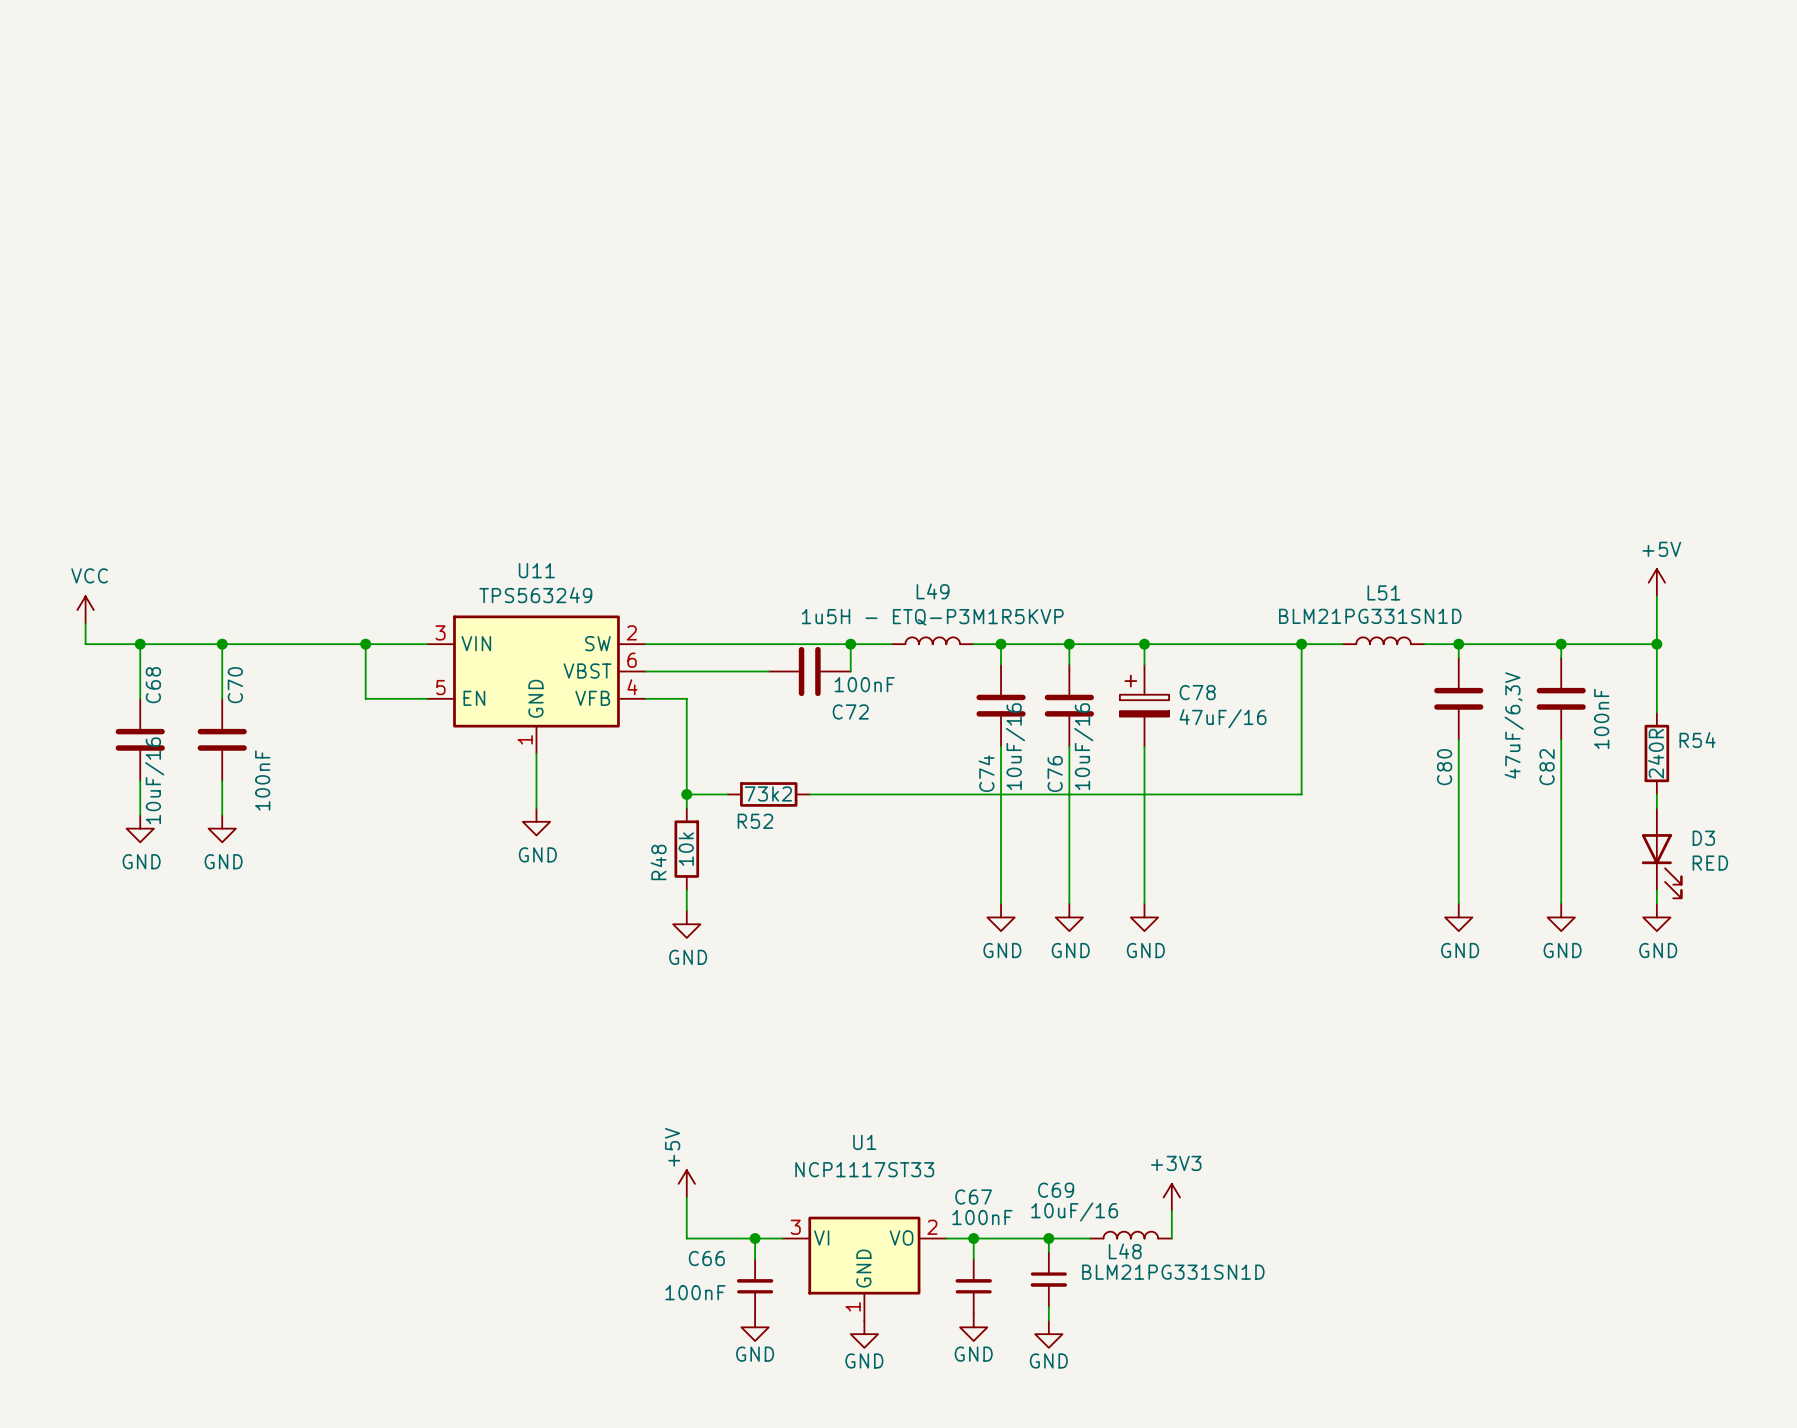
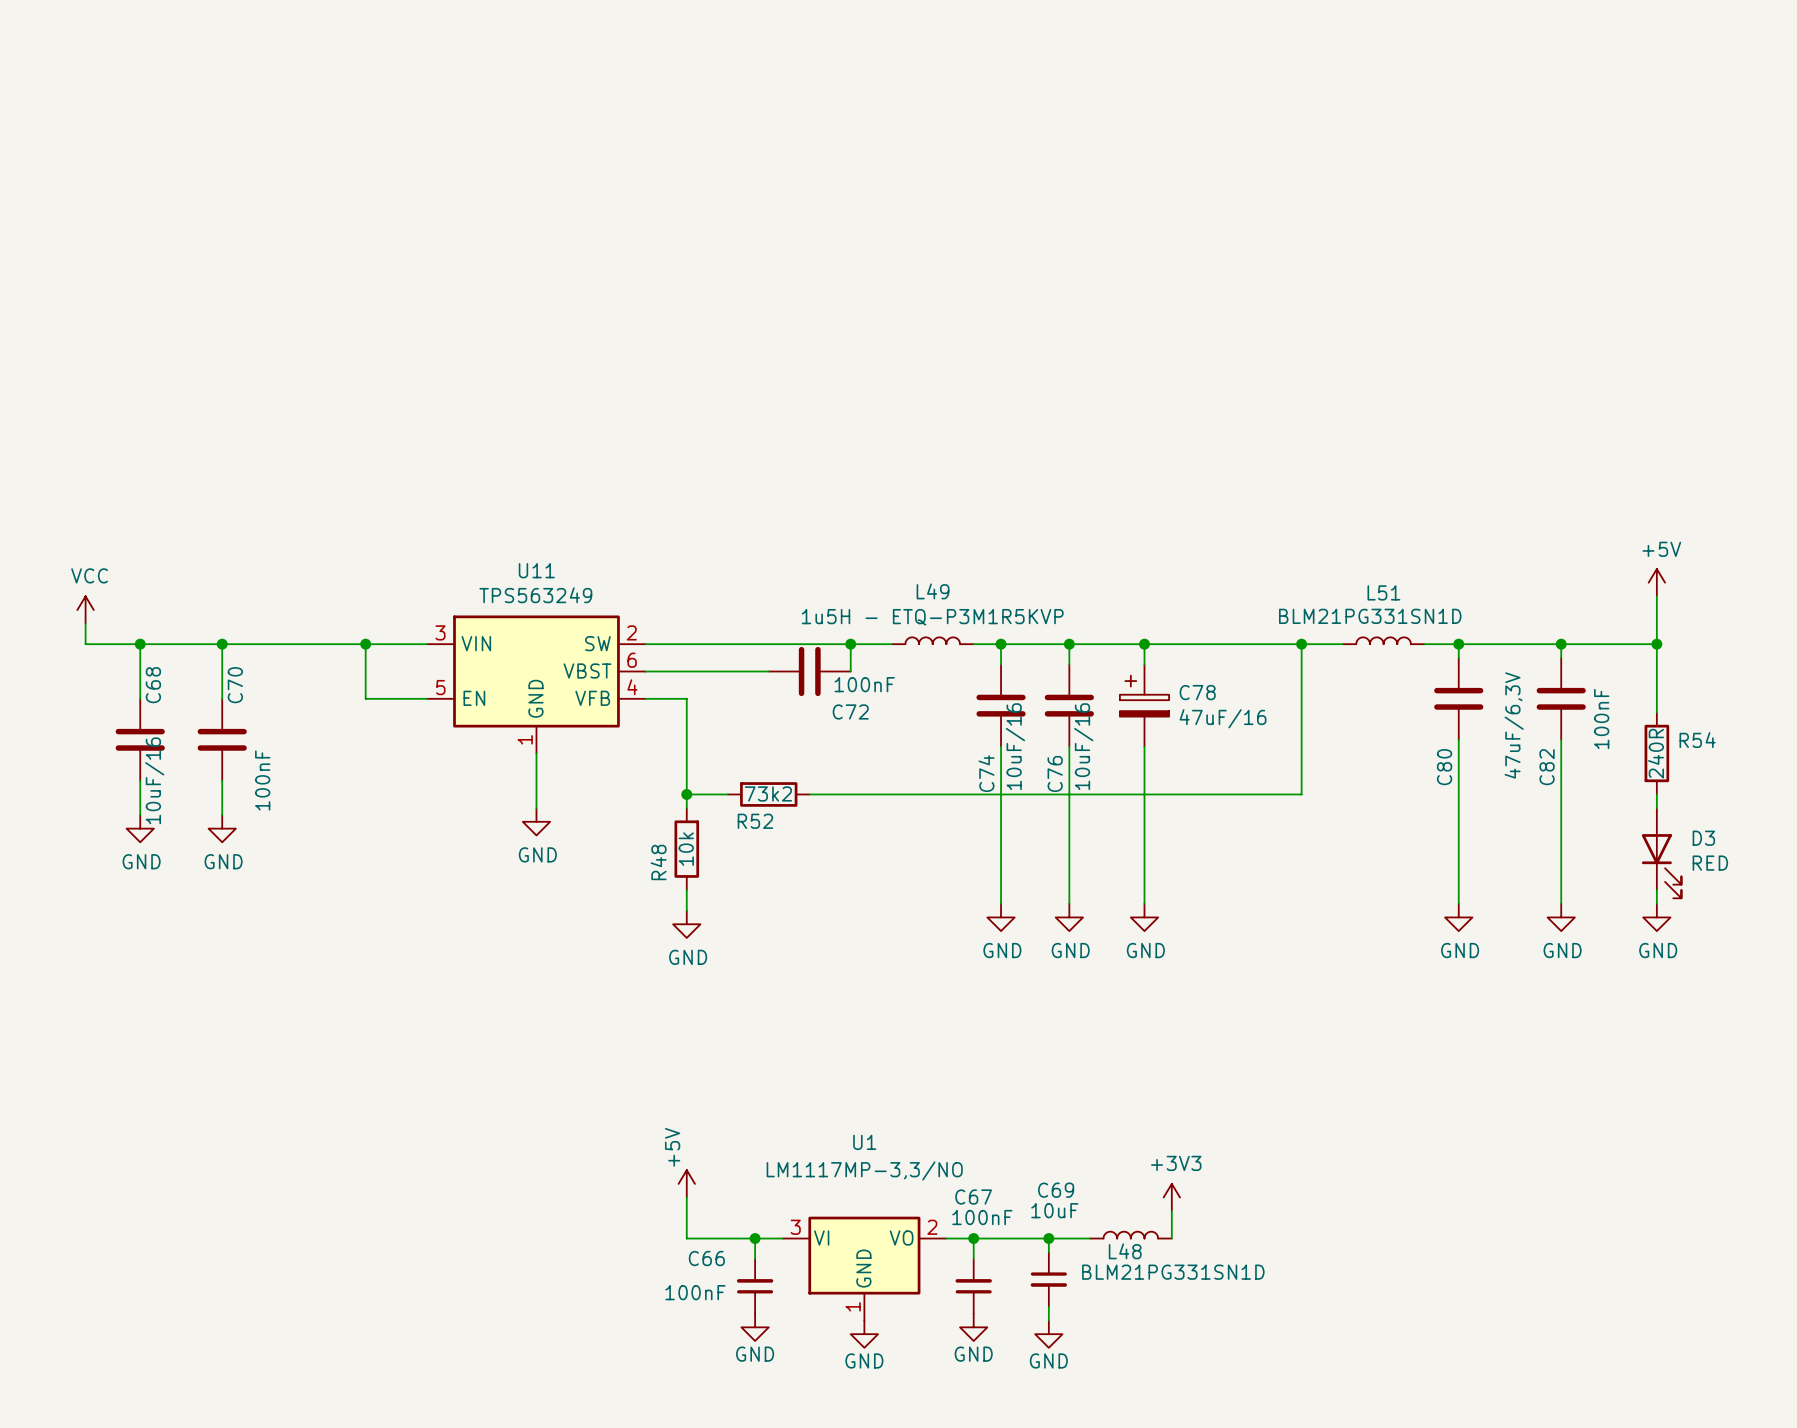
U1 value: NCP1117ST33 (864, 1169) -> LM1117MP-3,3/NO (864, 1171)
C69 value: 10uF/16 (1074, 1211) -> 10uF (1054, 1210)

